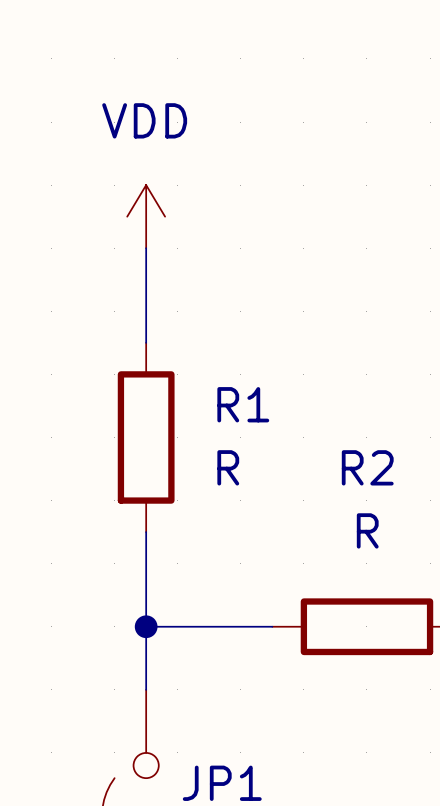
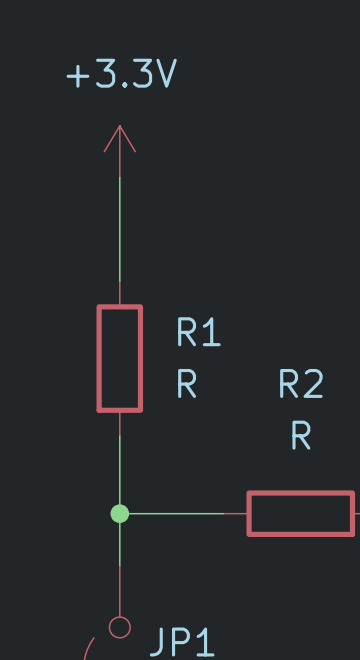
power symbol: none -> +3.3V (119, 151)
power symbol: VDD (146, 216) -> none

